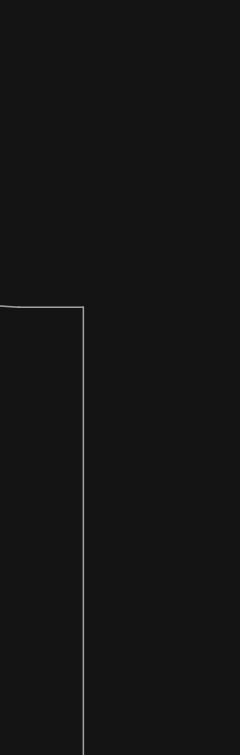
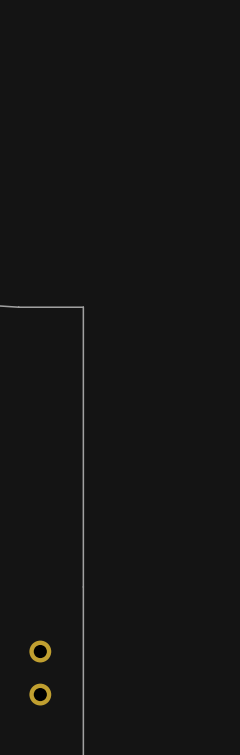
via: none -> (40, 651)
via: none -> (40, 694)

